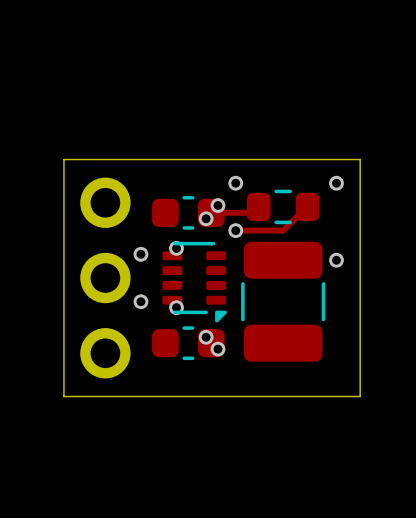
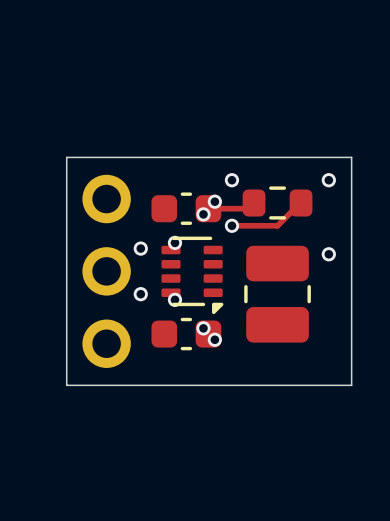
part footprint: [241, 241, 326, 362] -> [244, 245, 311, 343]

